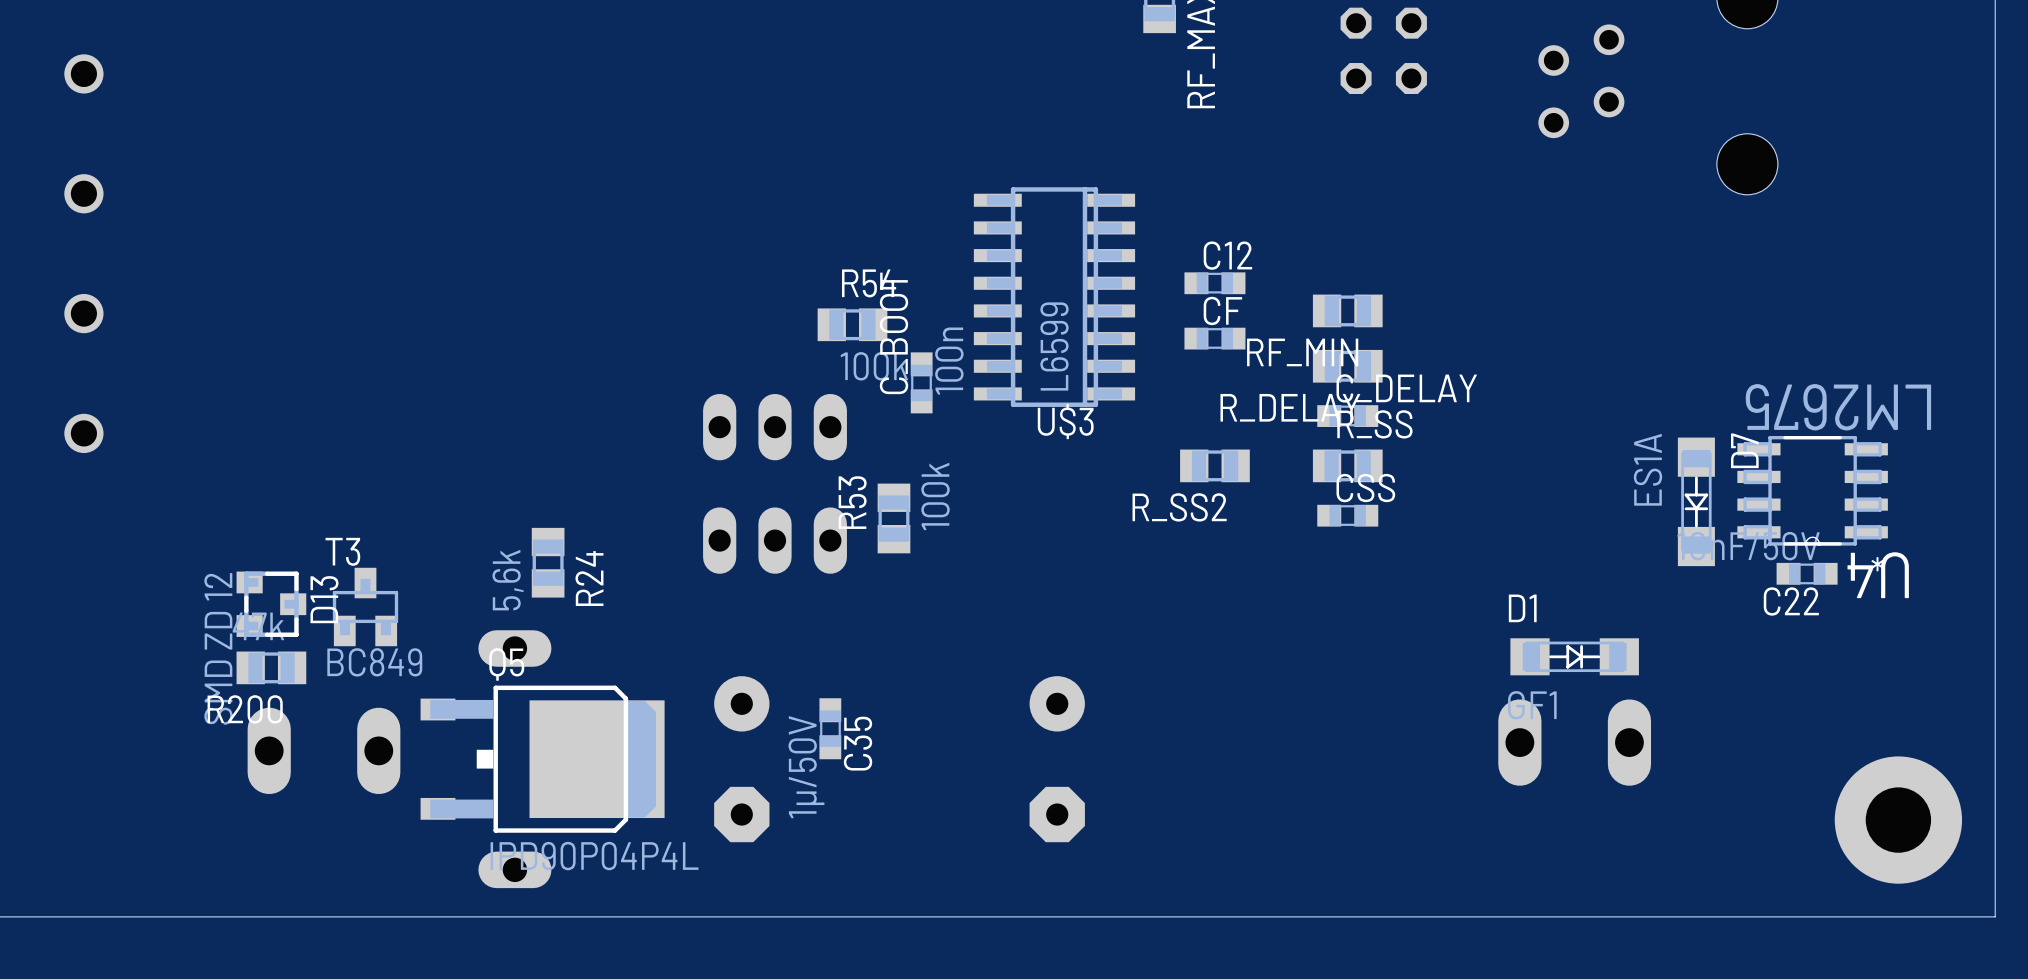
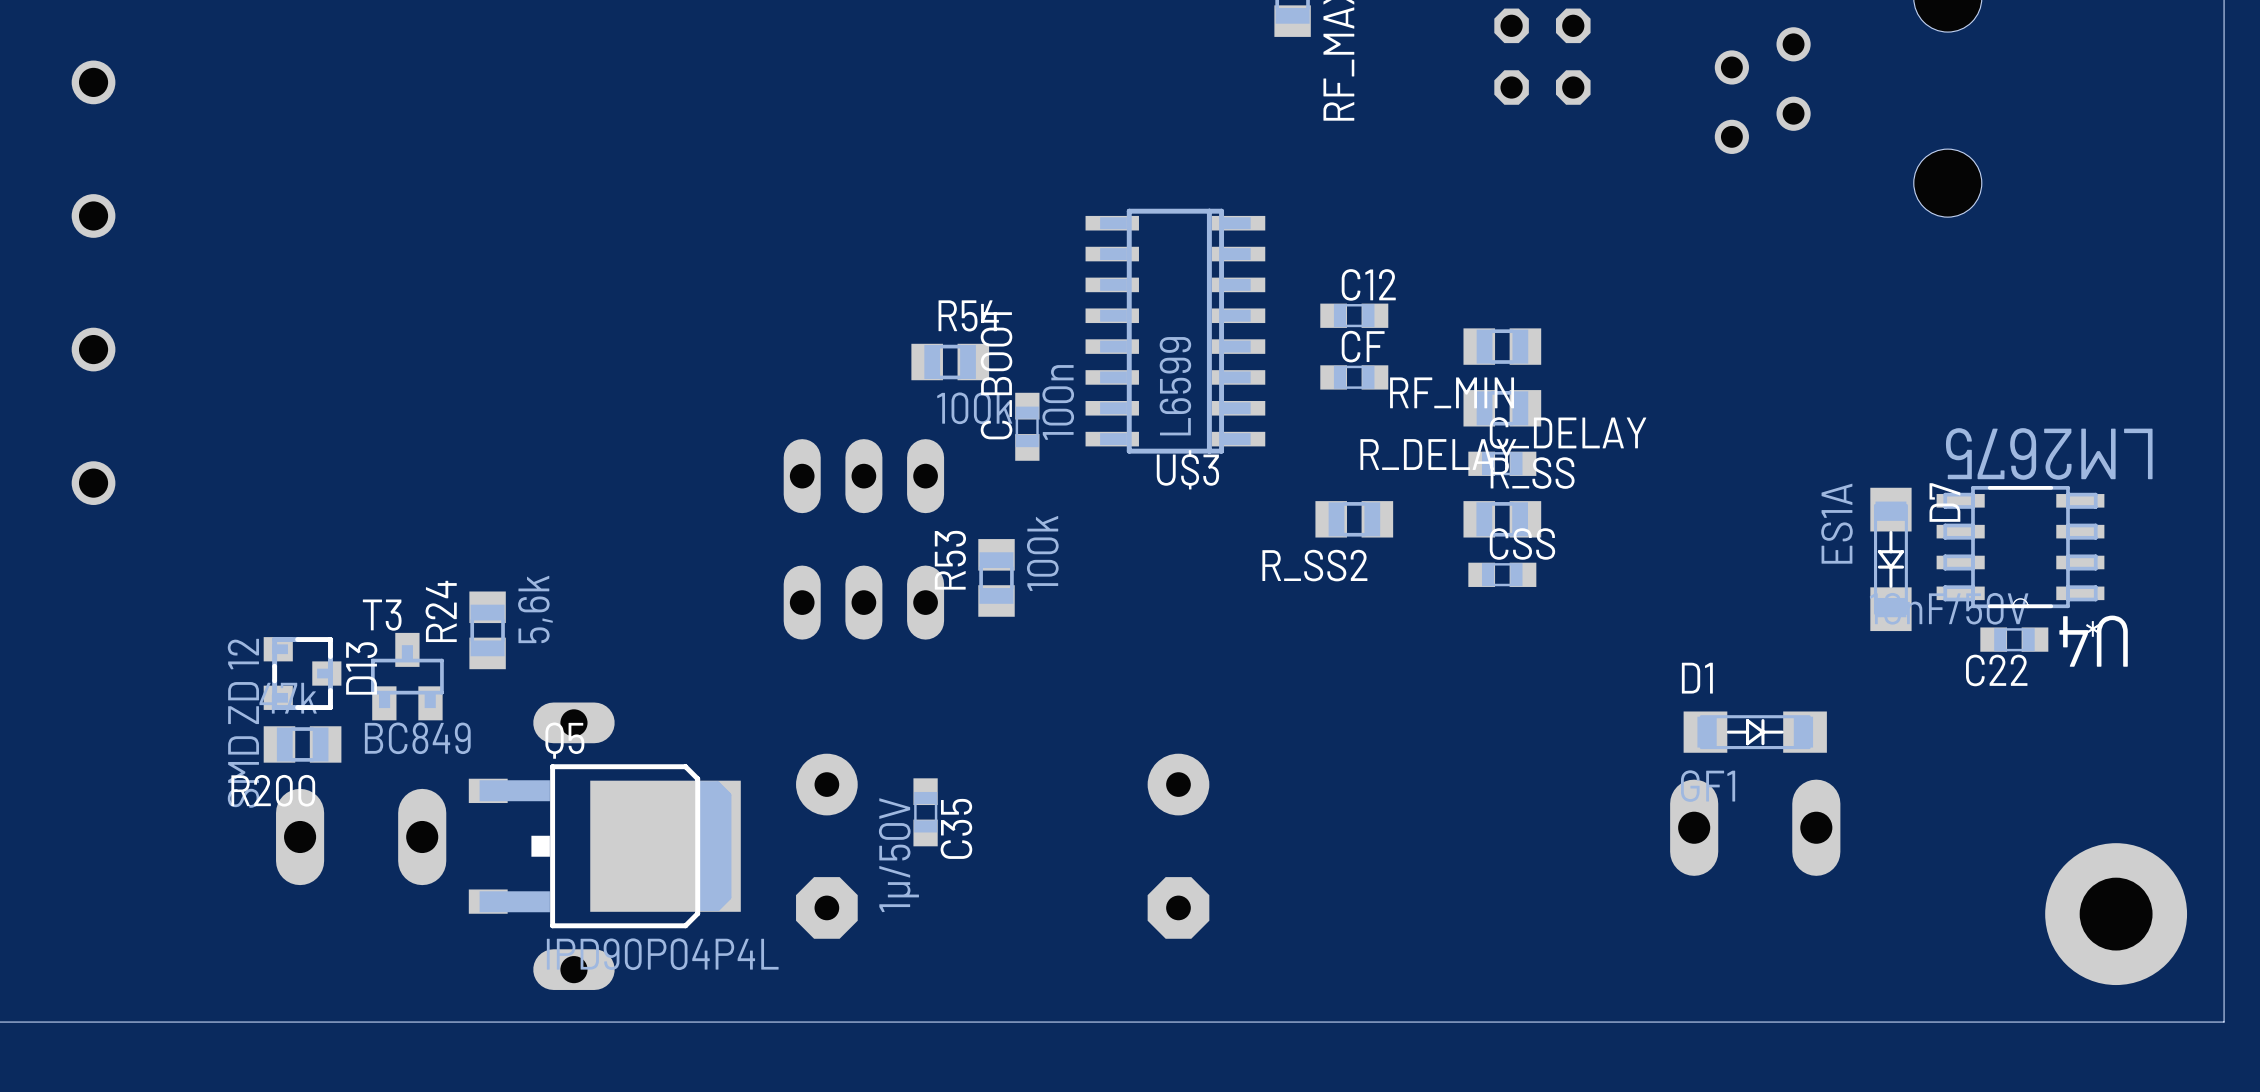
R24 position: (548, 562) -> (487, 630)
R24 name position: R24 (589, 578) -> R24 (441, 611)
R24 value position: 5,6k (508, 580) -> 5,6k (535, 609)

